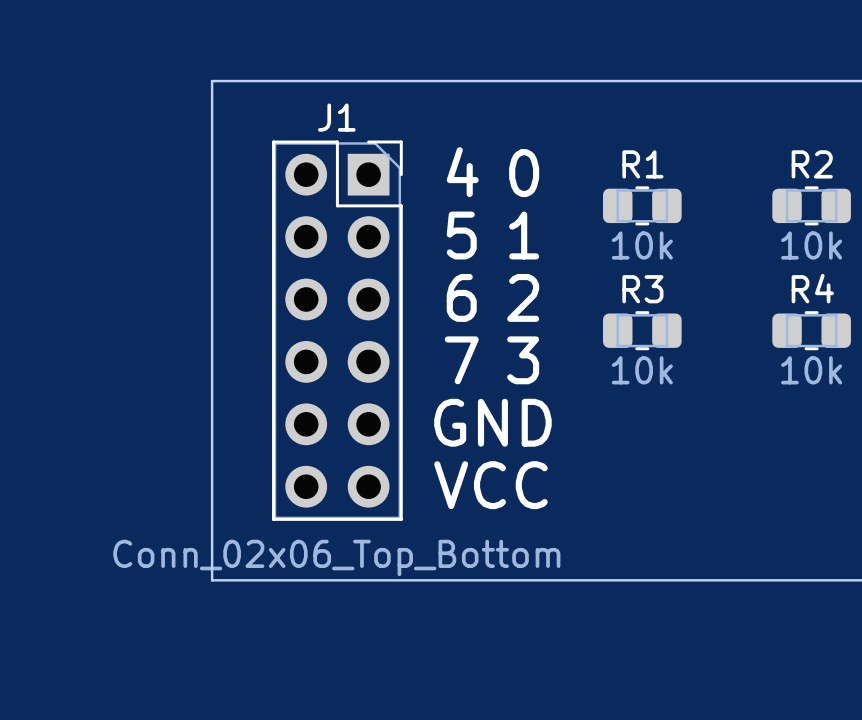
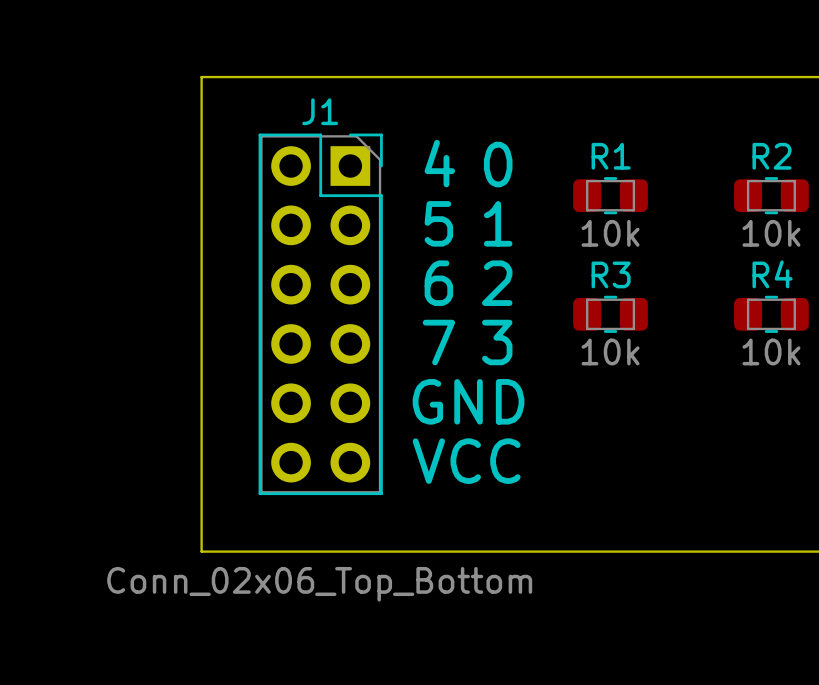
J1 value position: Conn_02x06_Top_Bottom (336, 557) -> Conn_02x06_Top_Bottom (319, 584)

